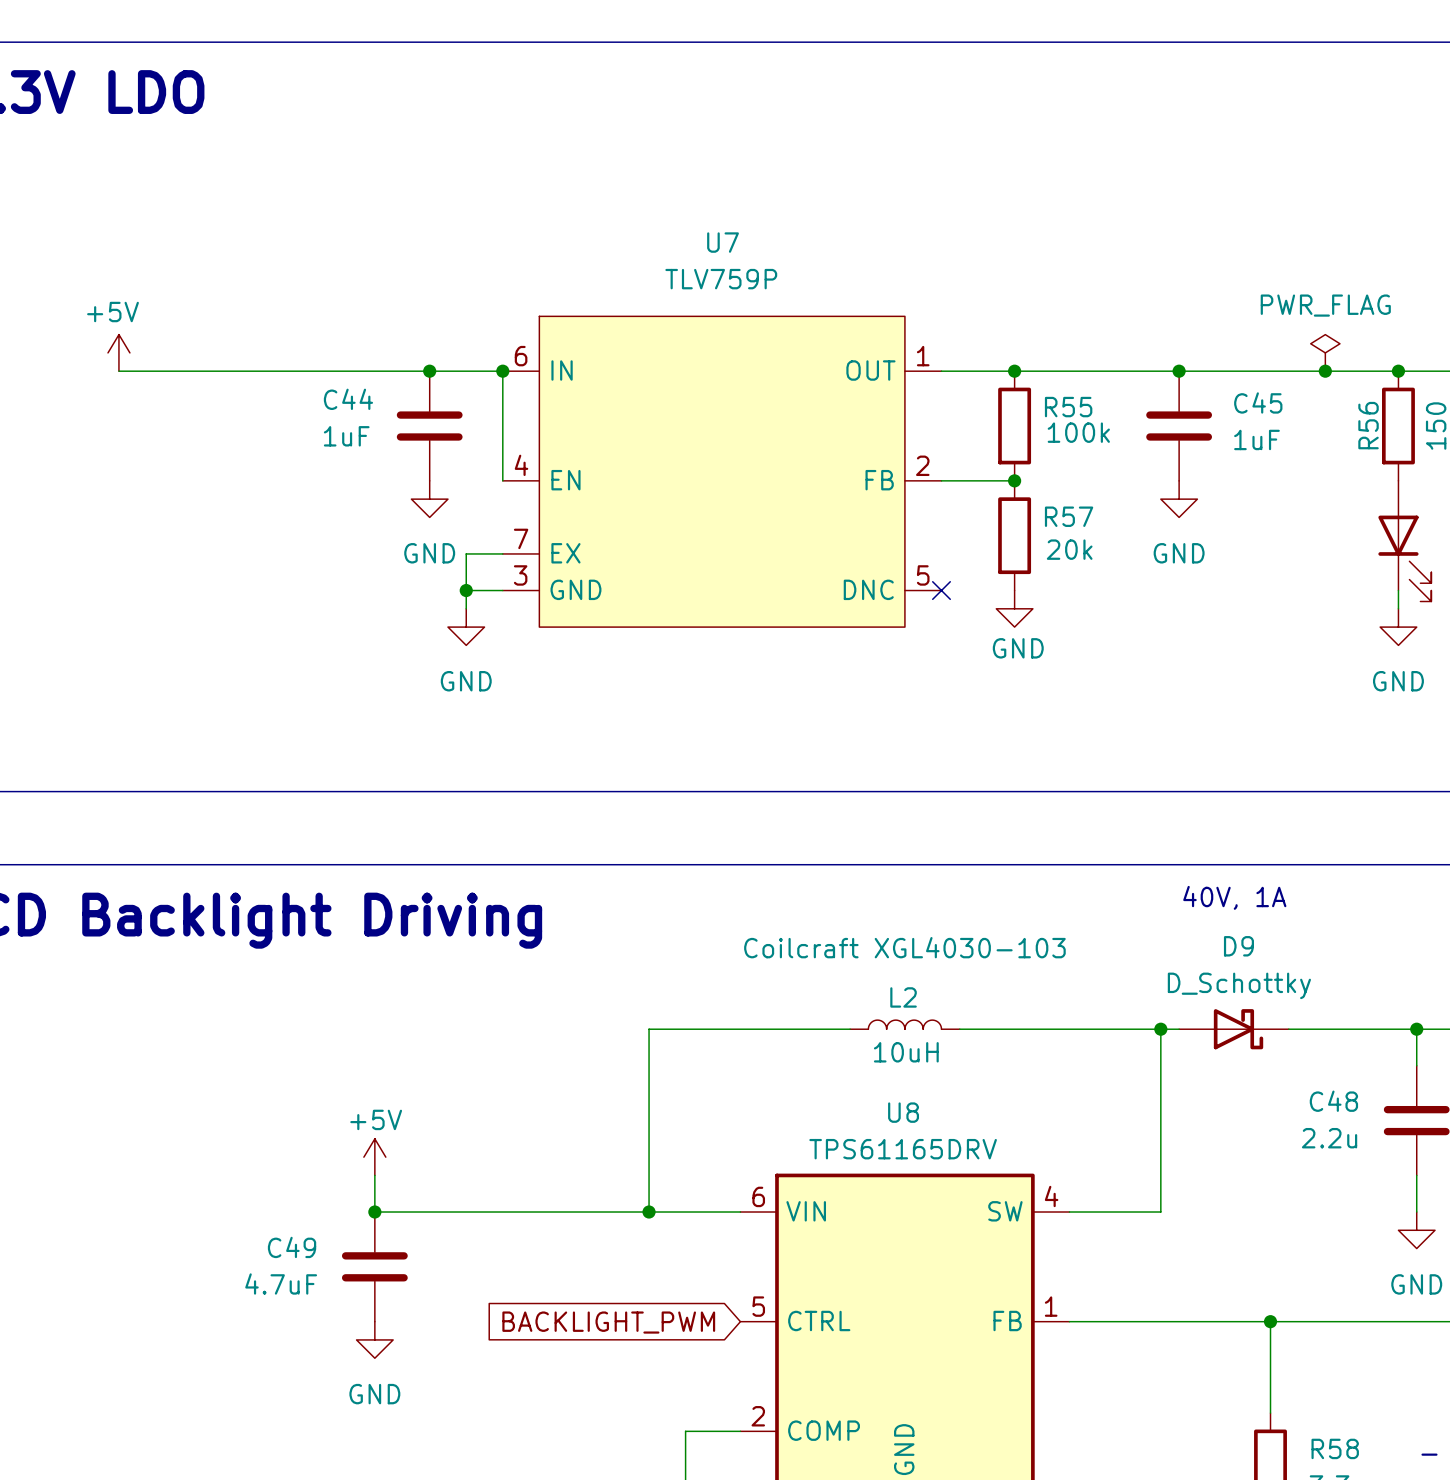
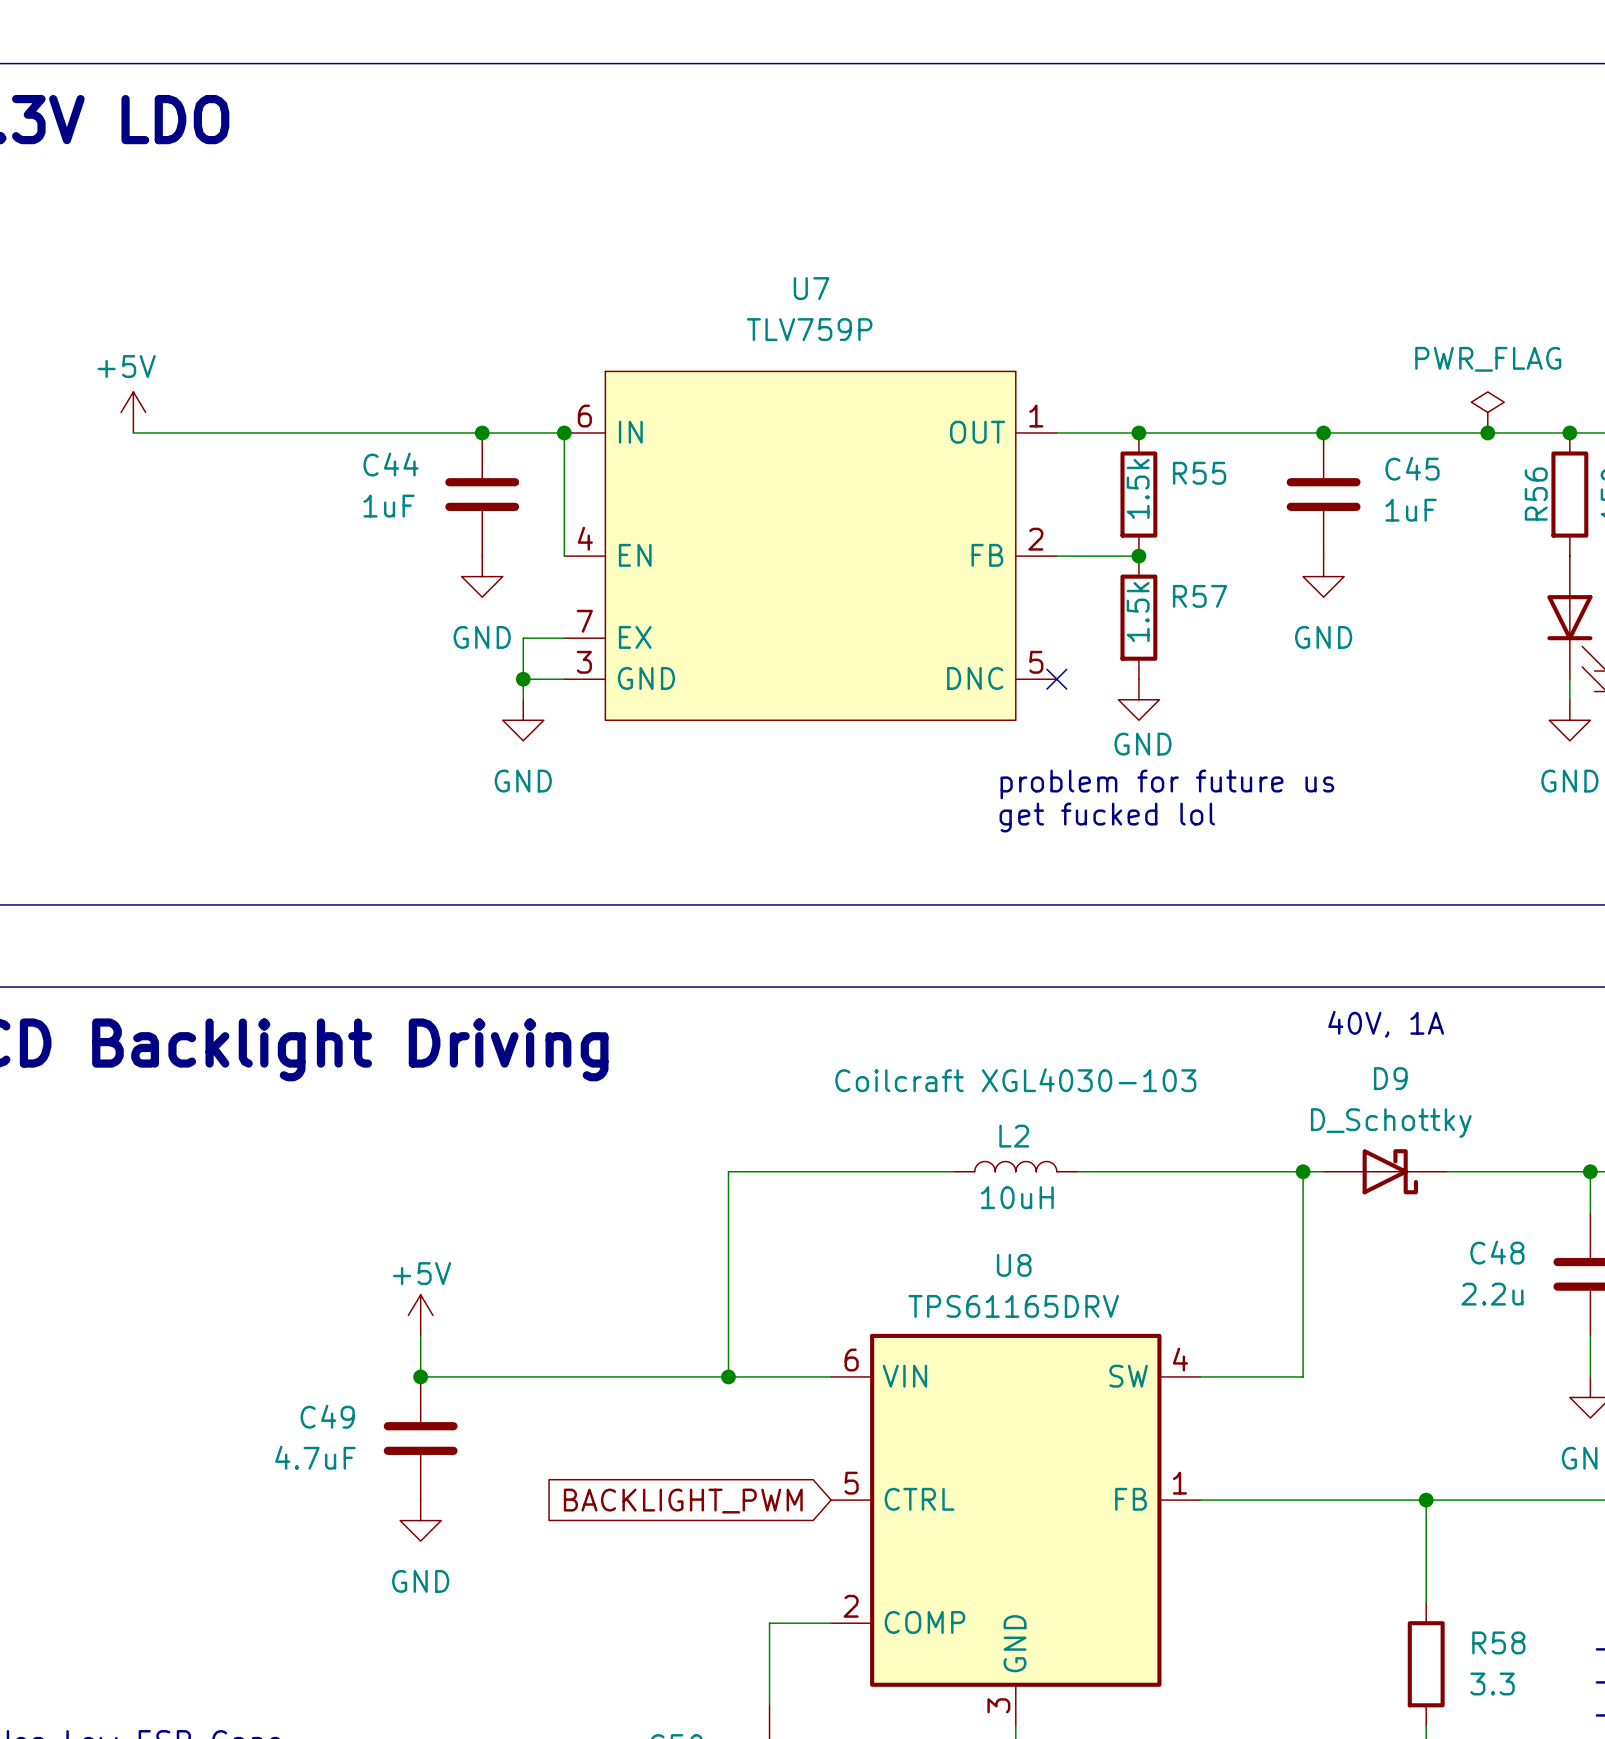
R55 value: 100k (1078, 432) -> 1.5k (1138, 488)
R57 value: 20k (1069, 549) -> 1.5k (1138, 612)
text: none -> problem for future us (1167, 784)
text: none -> get fucked lol (1107, 817)

